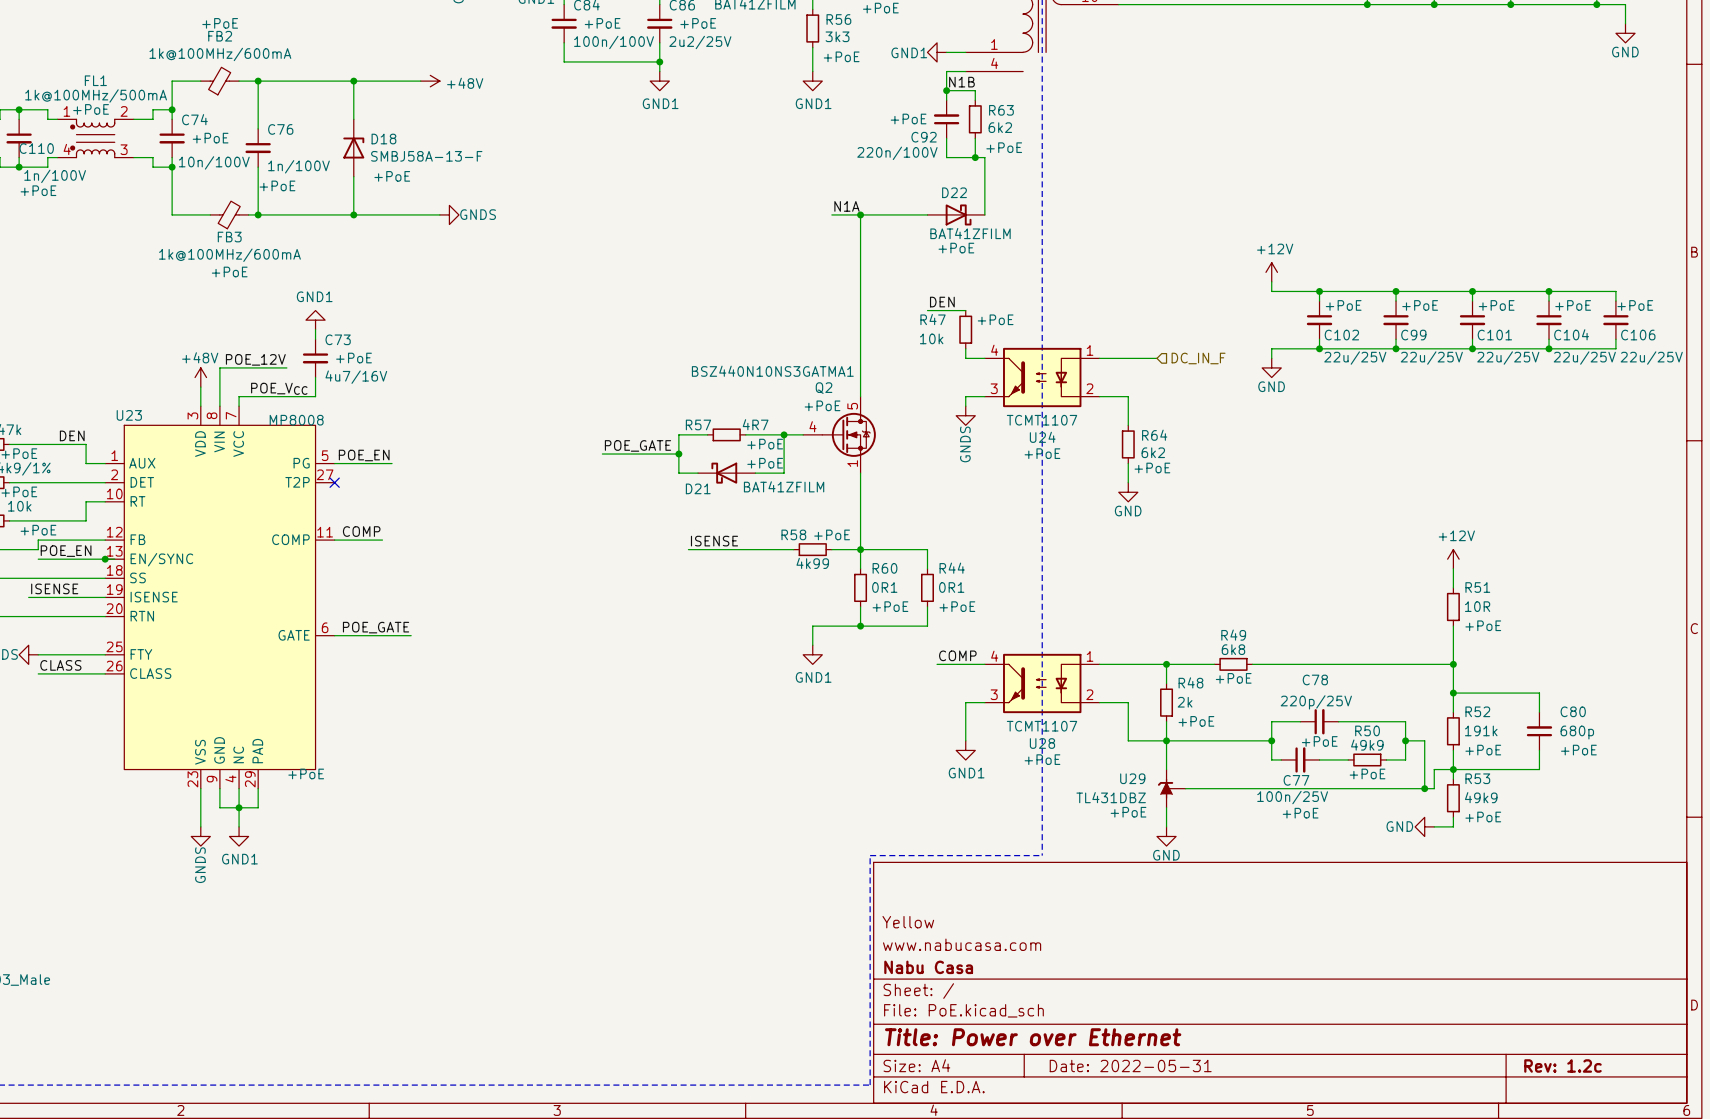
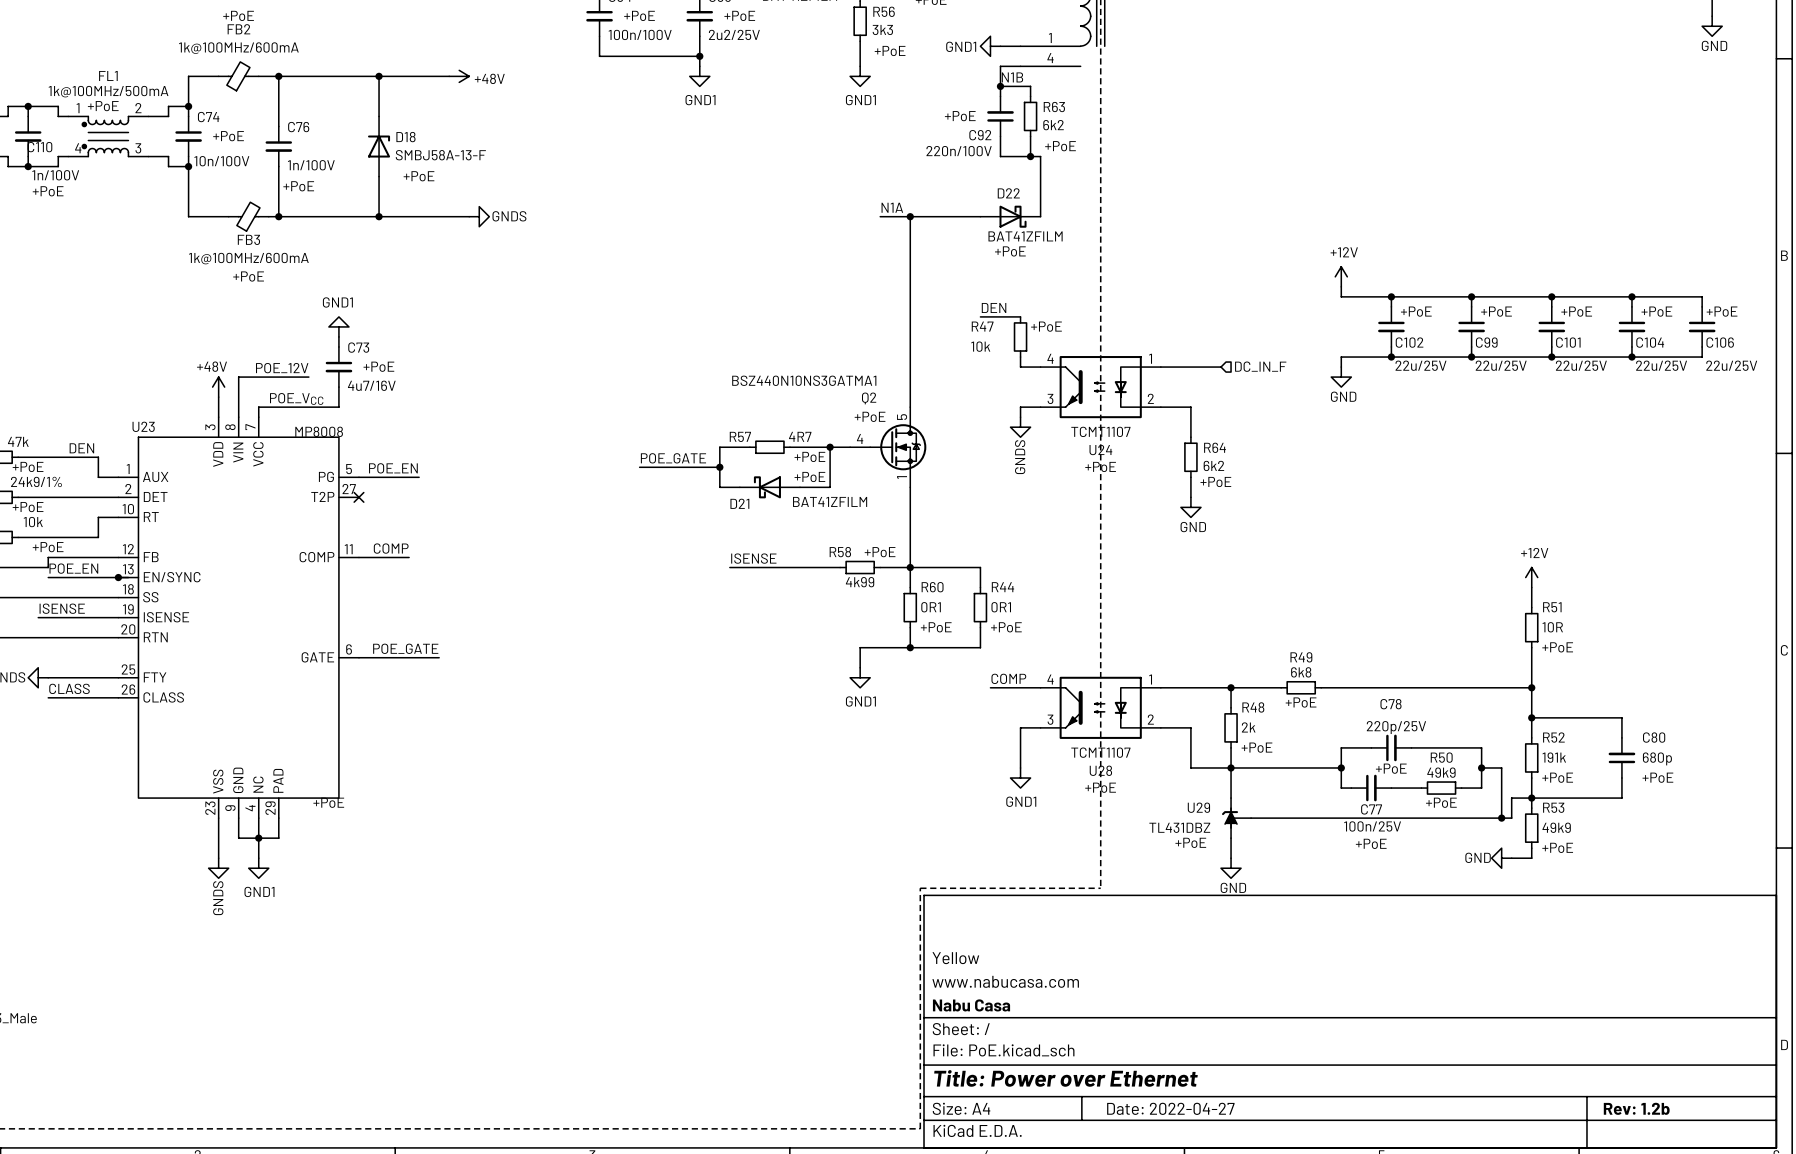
title block: Date: 2022-05-31 (1130, 1065) -> Date: 2022-04-27 (1170, 1108)
title block: Rev: 1.2c (1562, 1065) -> Rev: 1.2b (1636, 1108)

